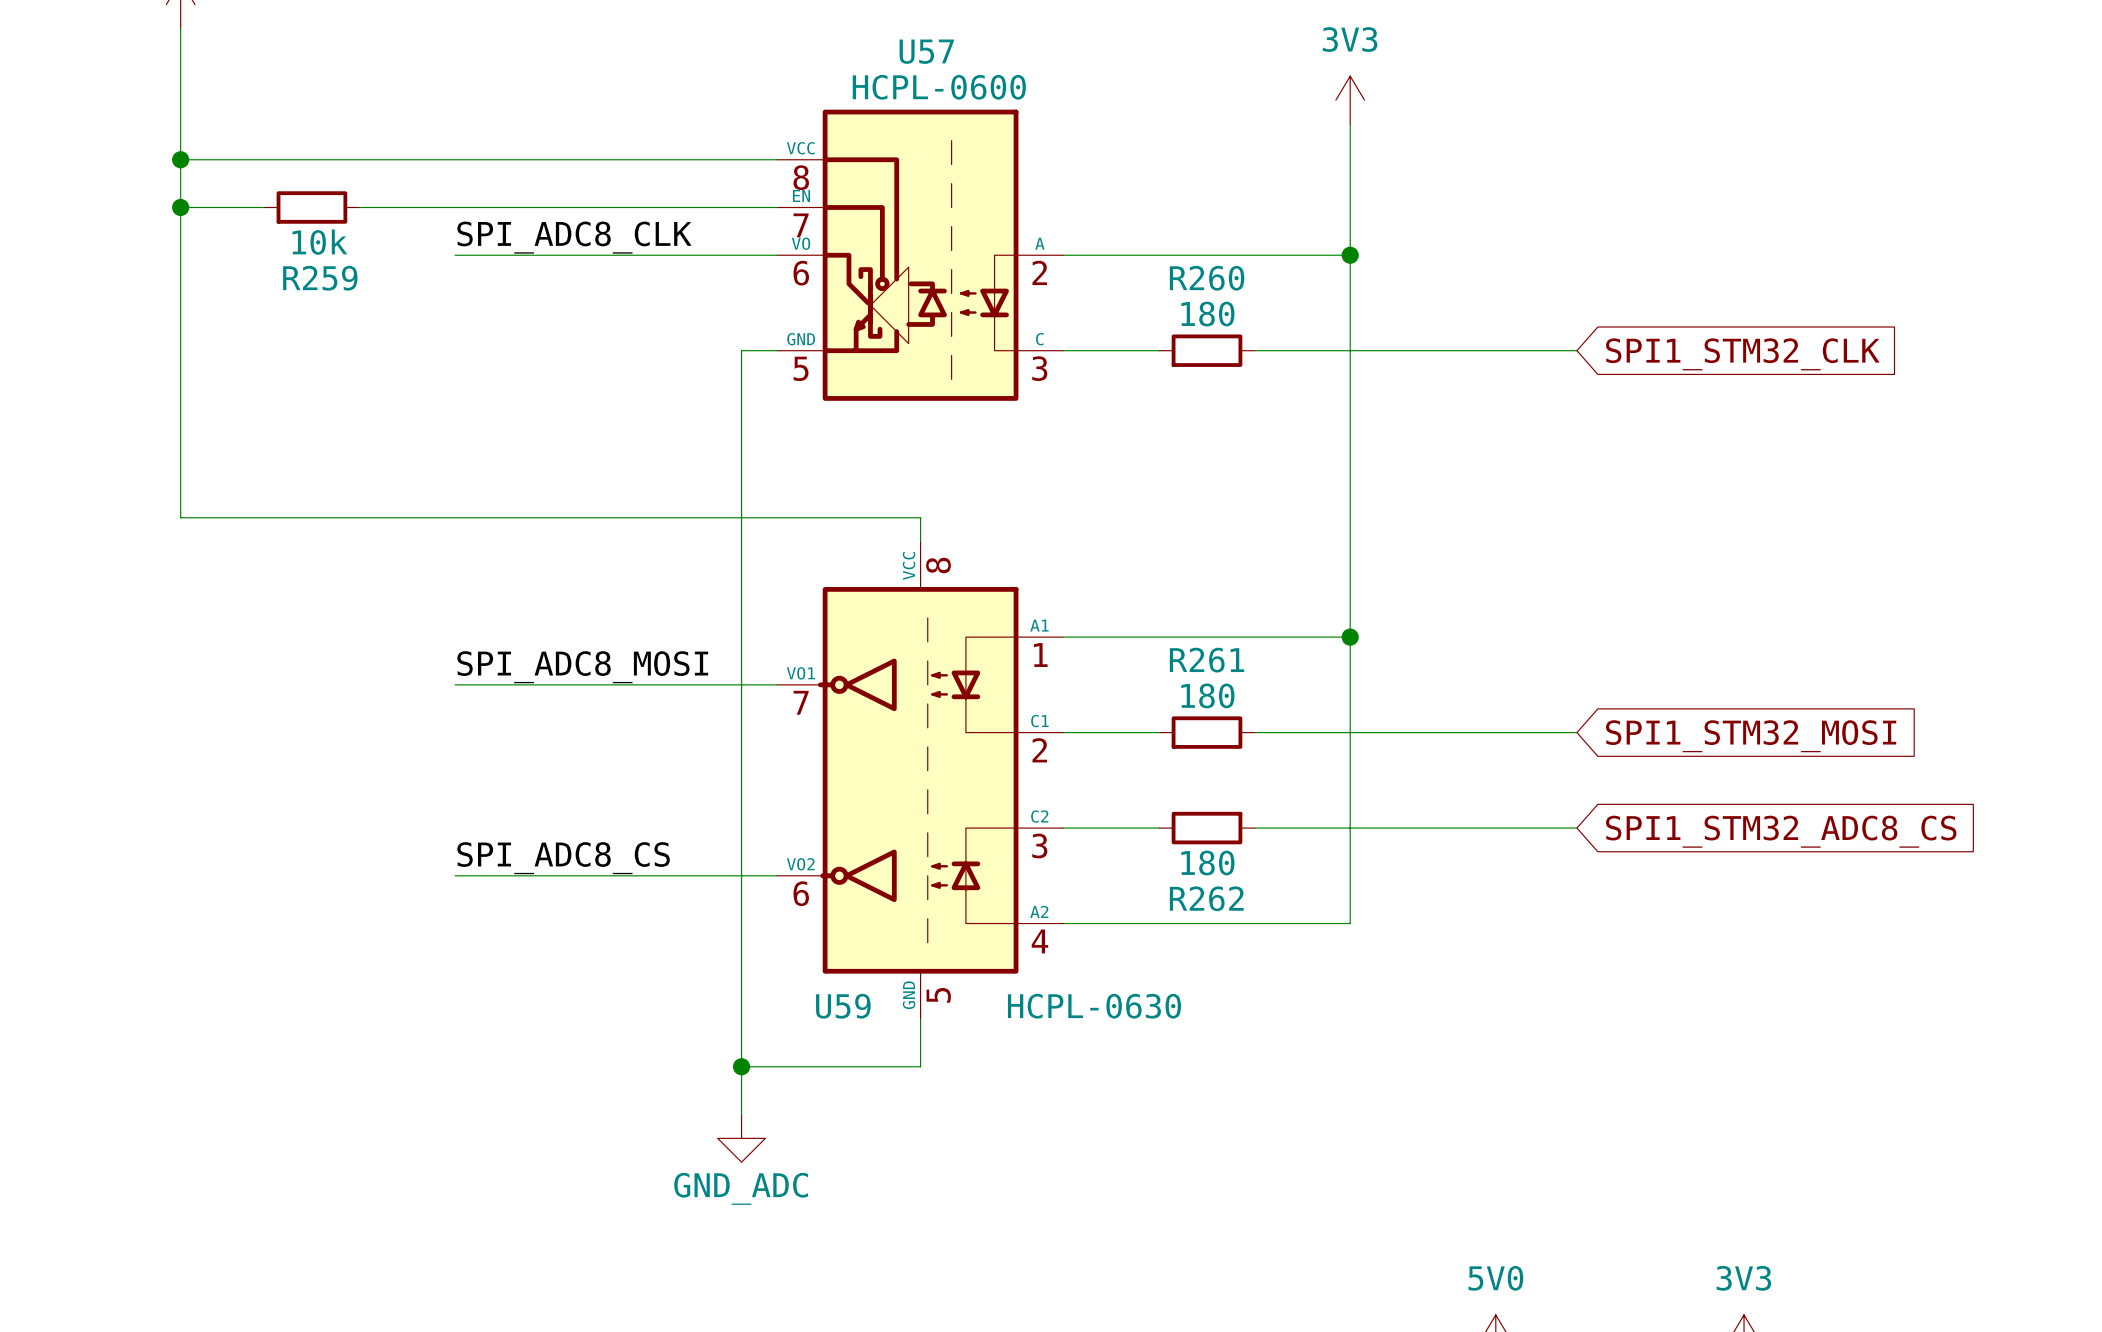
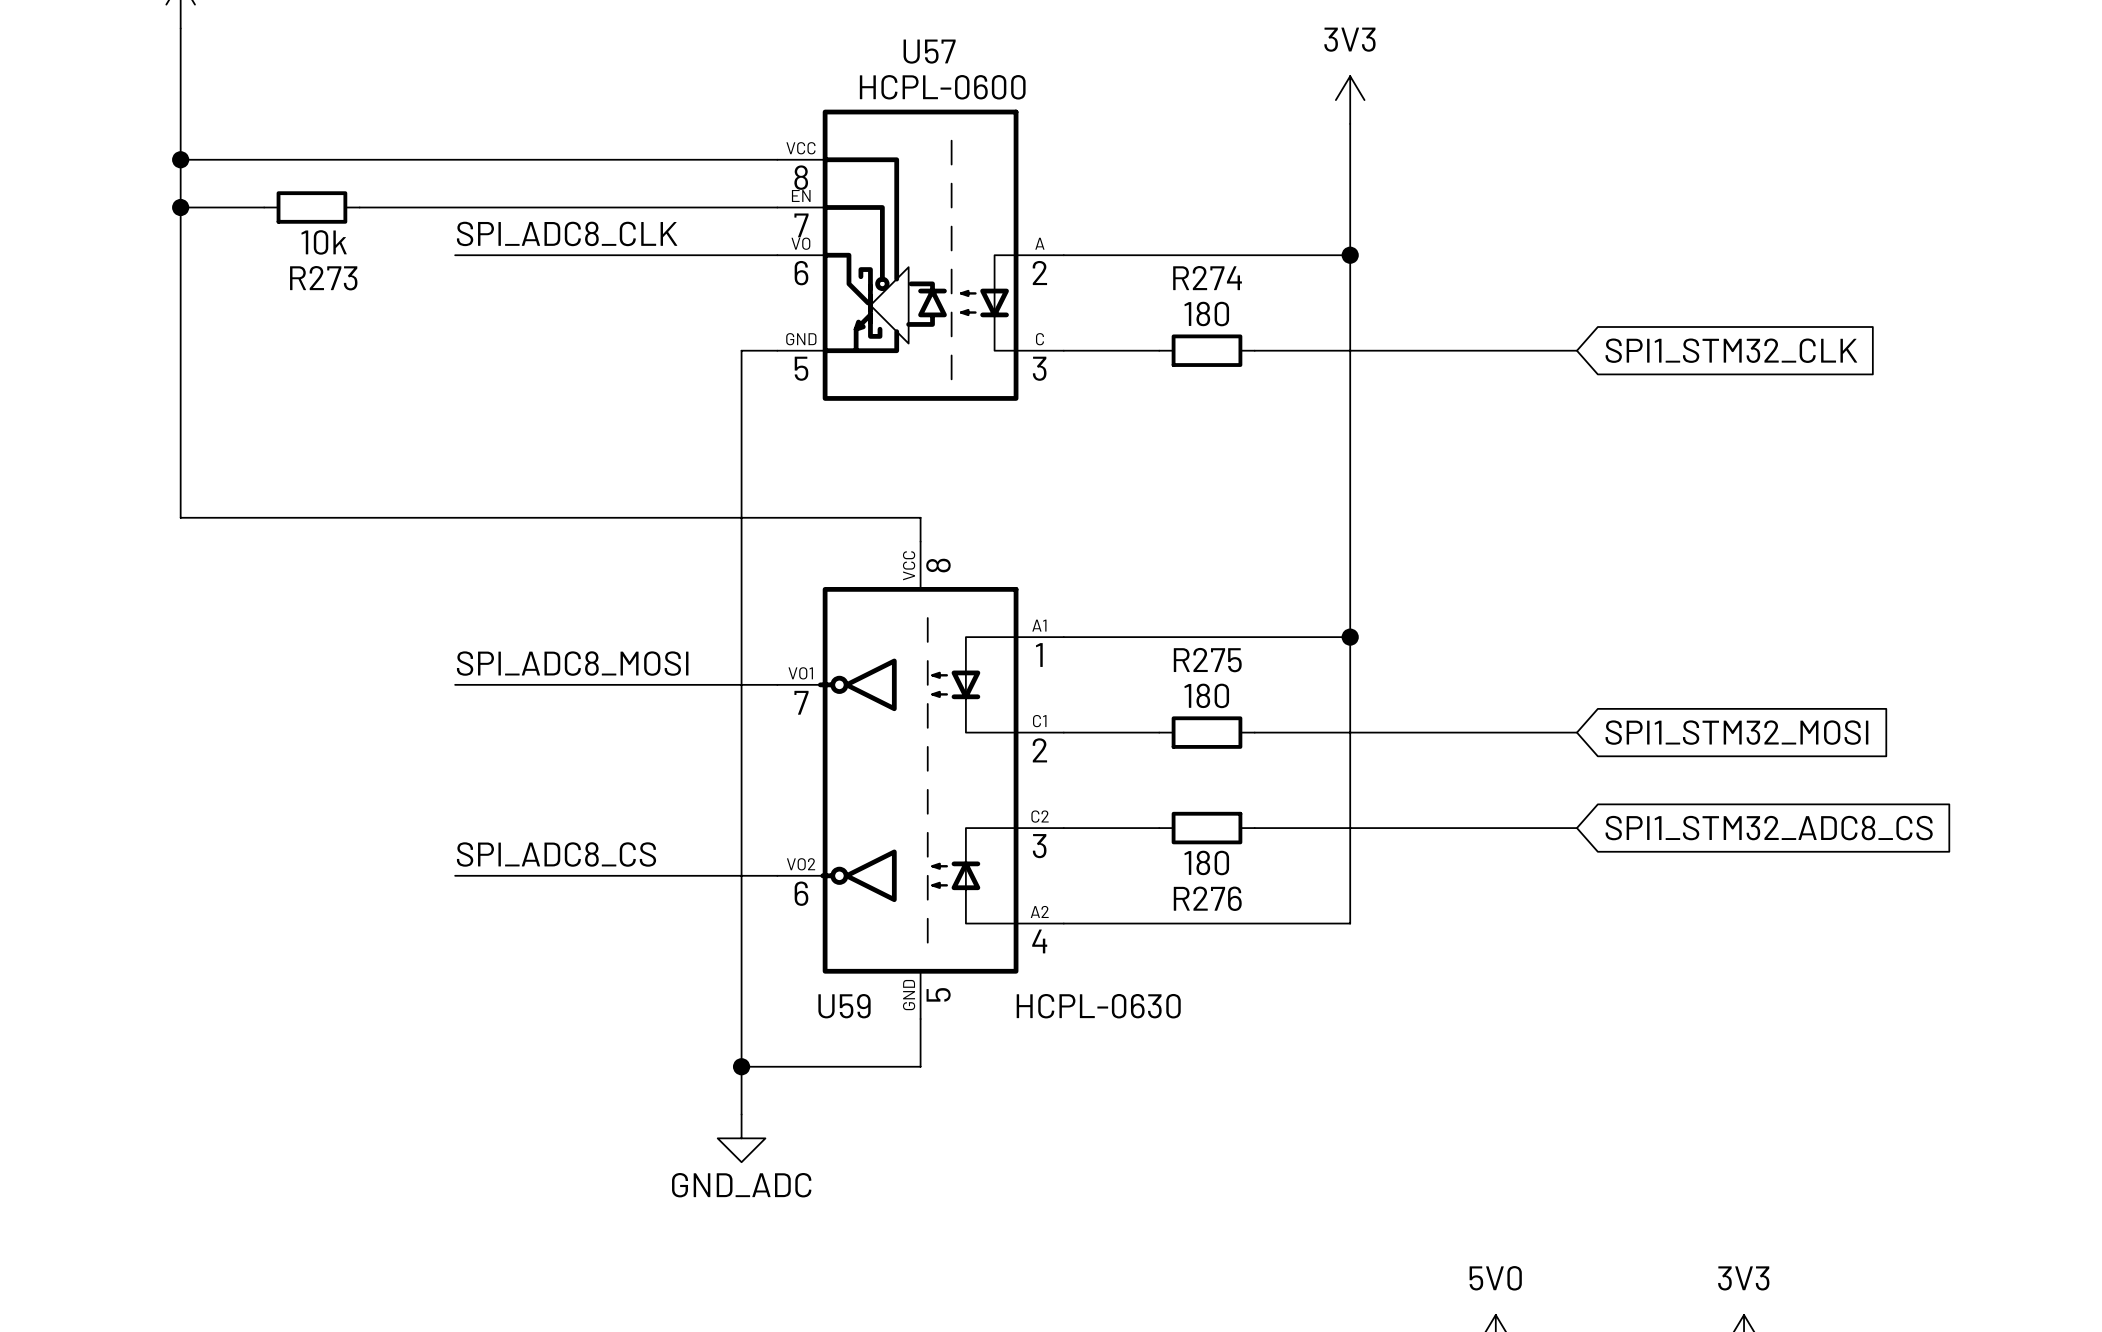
R259 name: R259 (320, 278) -> R273 (323, 278)
R260 name: R260 (1207, 278) -> R274 (1207, 278)
R261 name: R261 (1207, 660) -> R275 (1207, 660)
R262 name: R262 (1206, 898) -> R276 (1207, 898)

